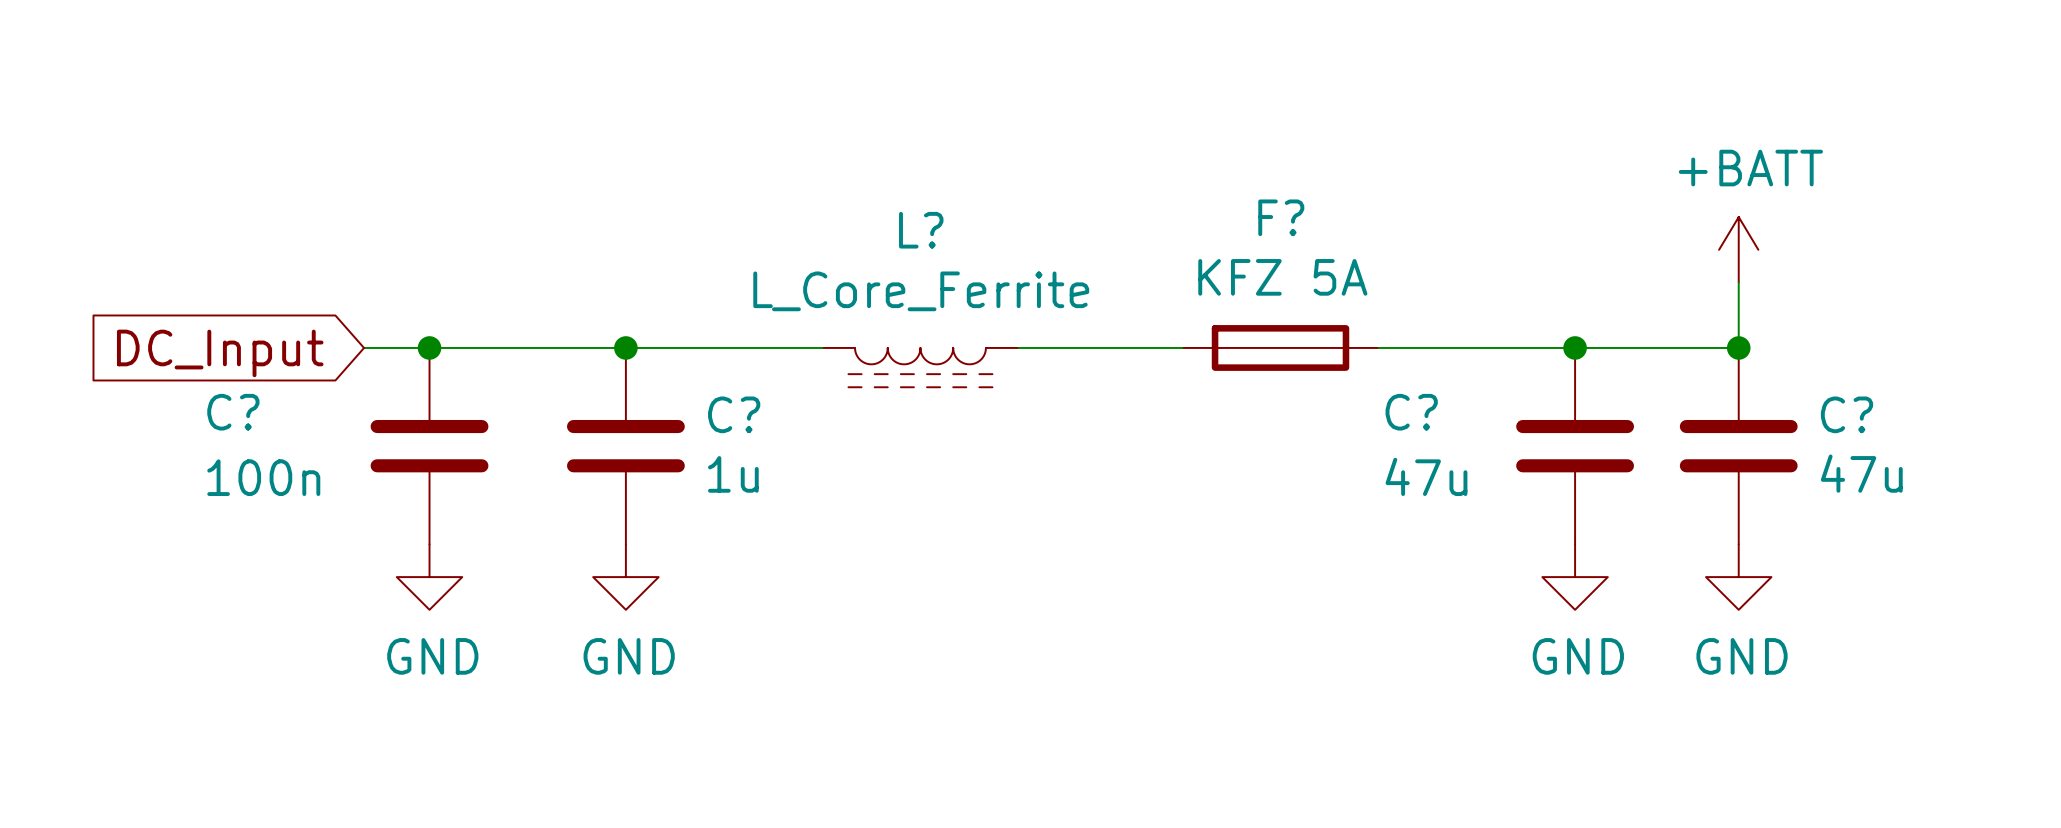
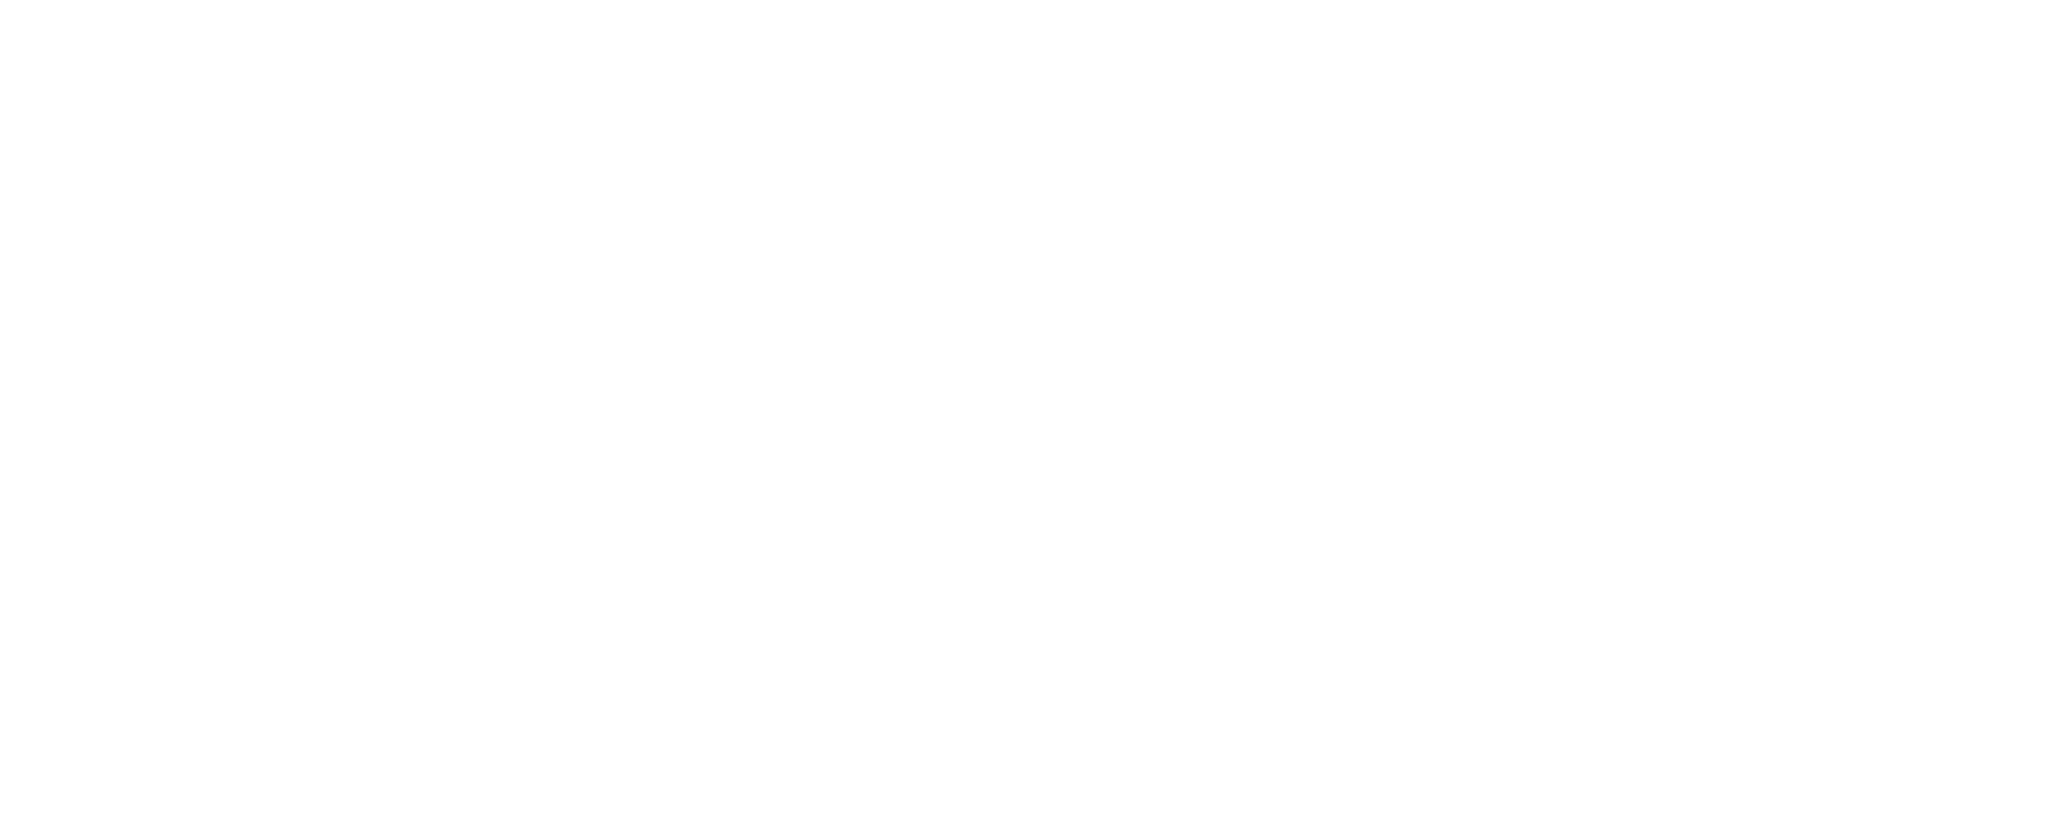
power symbol: +BATT (1738, 249) -> none
wire: (1738, 282) (1738, 347) (1378, 347) -> none
wire: (364, 347) (822, 347) -> none
junction: (429, 347) -> none
junction: (625, 347) -> none
wire: (1018, 347) (1182, 347) -> none
F?: KFZ 5A (1280, 347) -> none
junction: (1575, 347) -> none
junction: (1738, 347) -> none
global label: DC_Input (220, 353) -> none
L?: L_Core_Ferrite (920, 367) -> none
C?: 100n (429, 446) -> none
C?: 1u (625, 446) -> none
C?: 47u (1575, 446) -> none
C?: 47u (1738, 446) -> none
power symbol: GND (429, 577) -> none
power symbol: GND (625, 577) -> none
power symbol: GND (1575, 577) -> none
power symbol: GND (1738, 577) -> none

